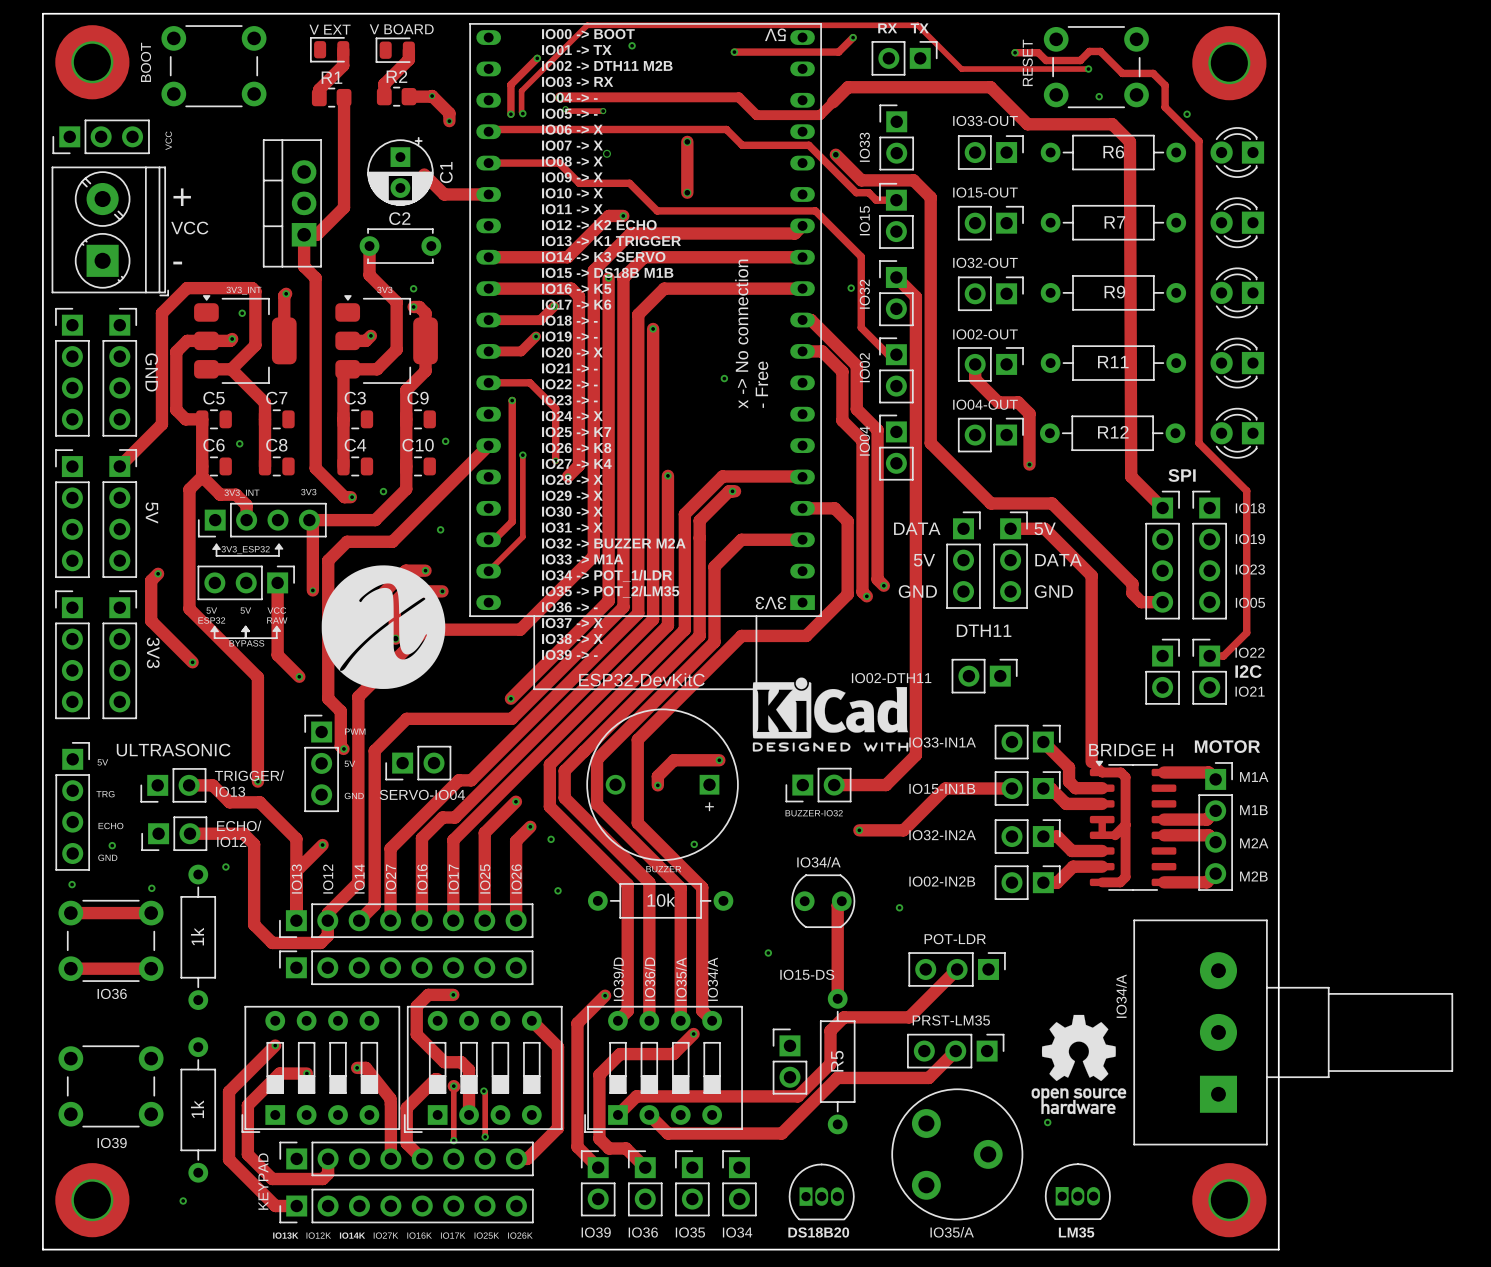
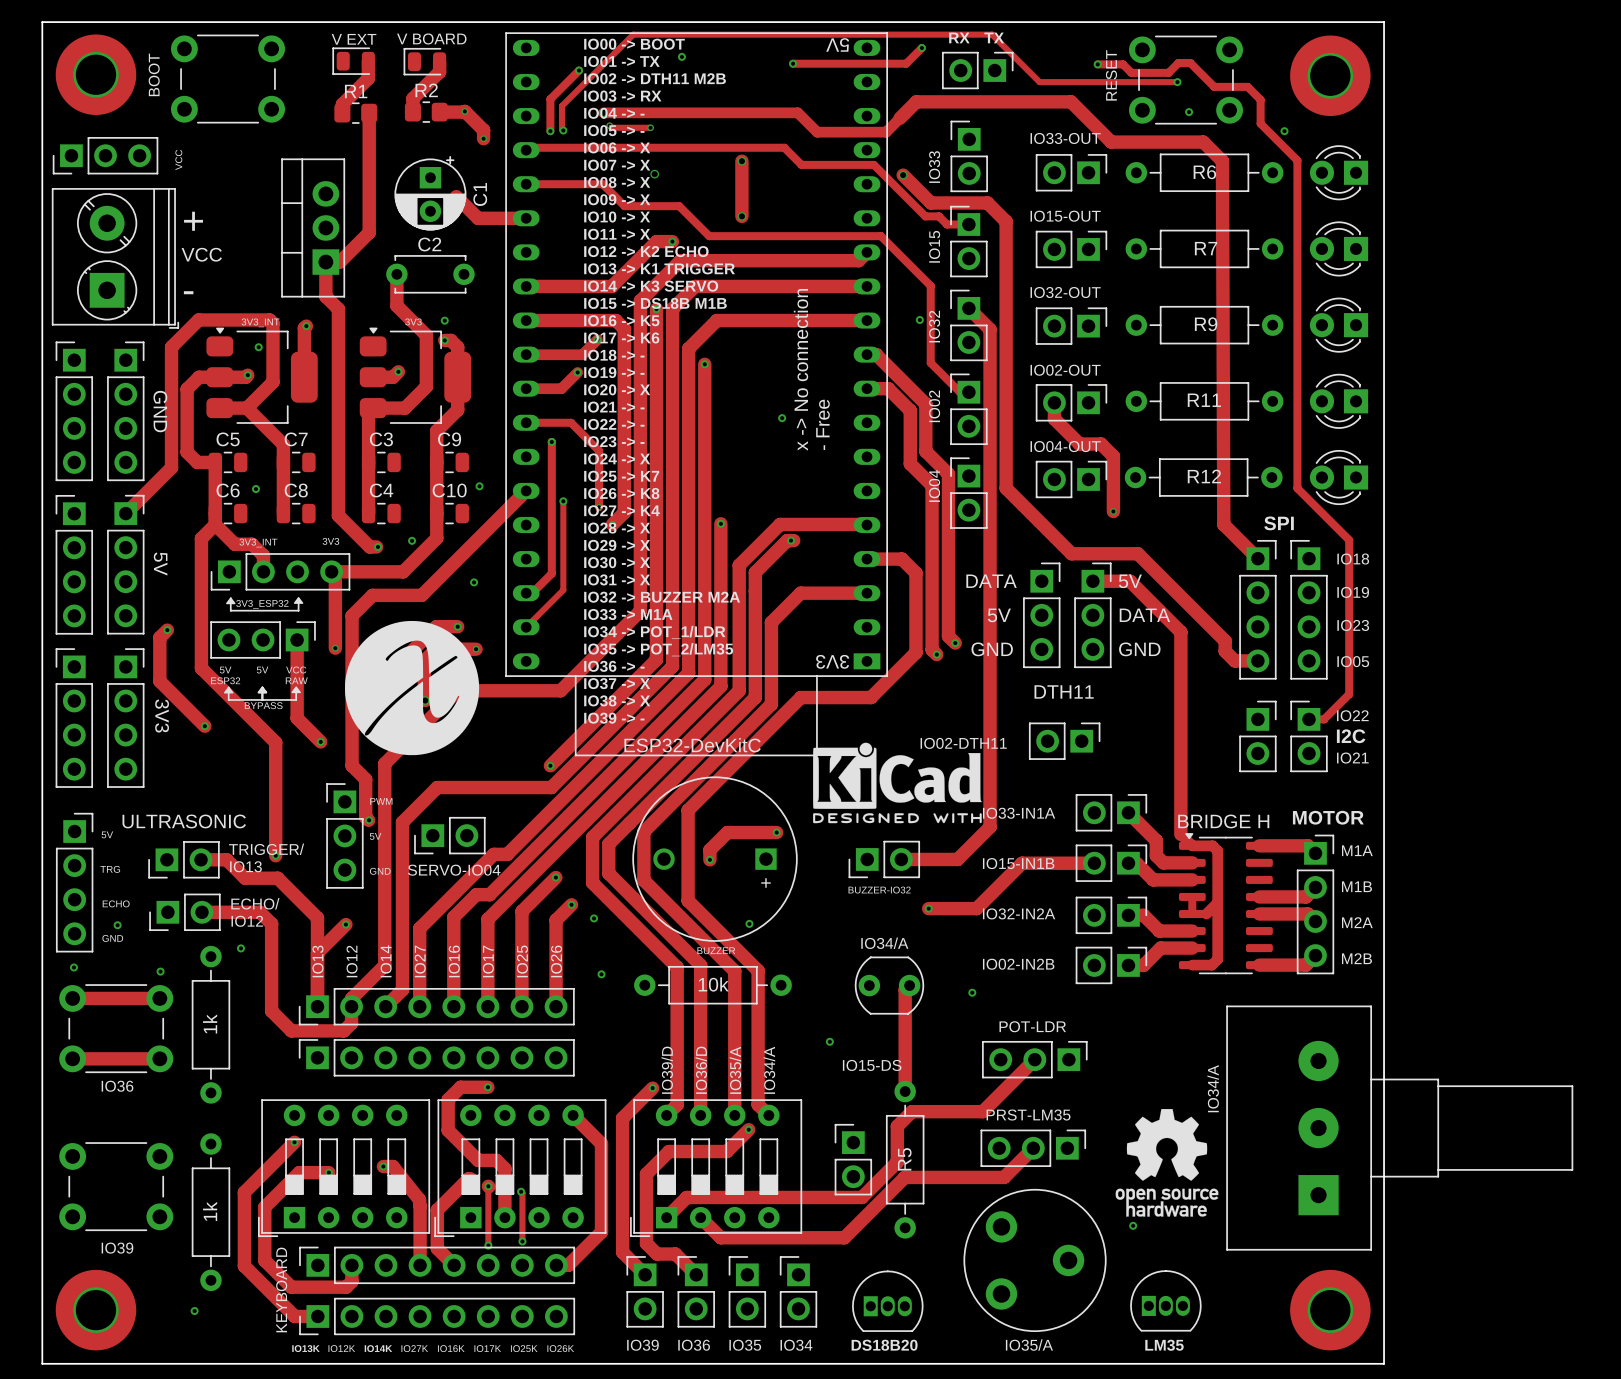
text: KEYPAD (263, 1181) -> KEYBOARD (281, 1289)

